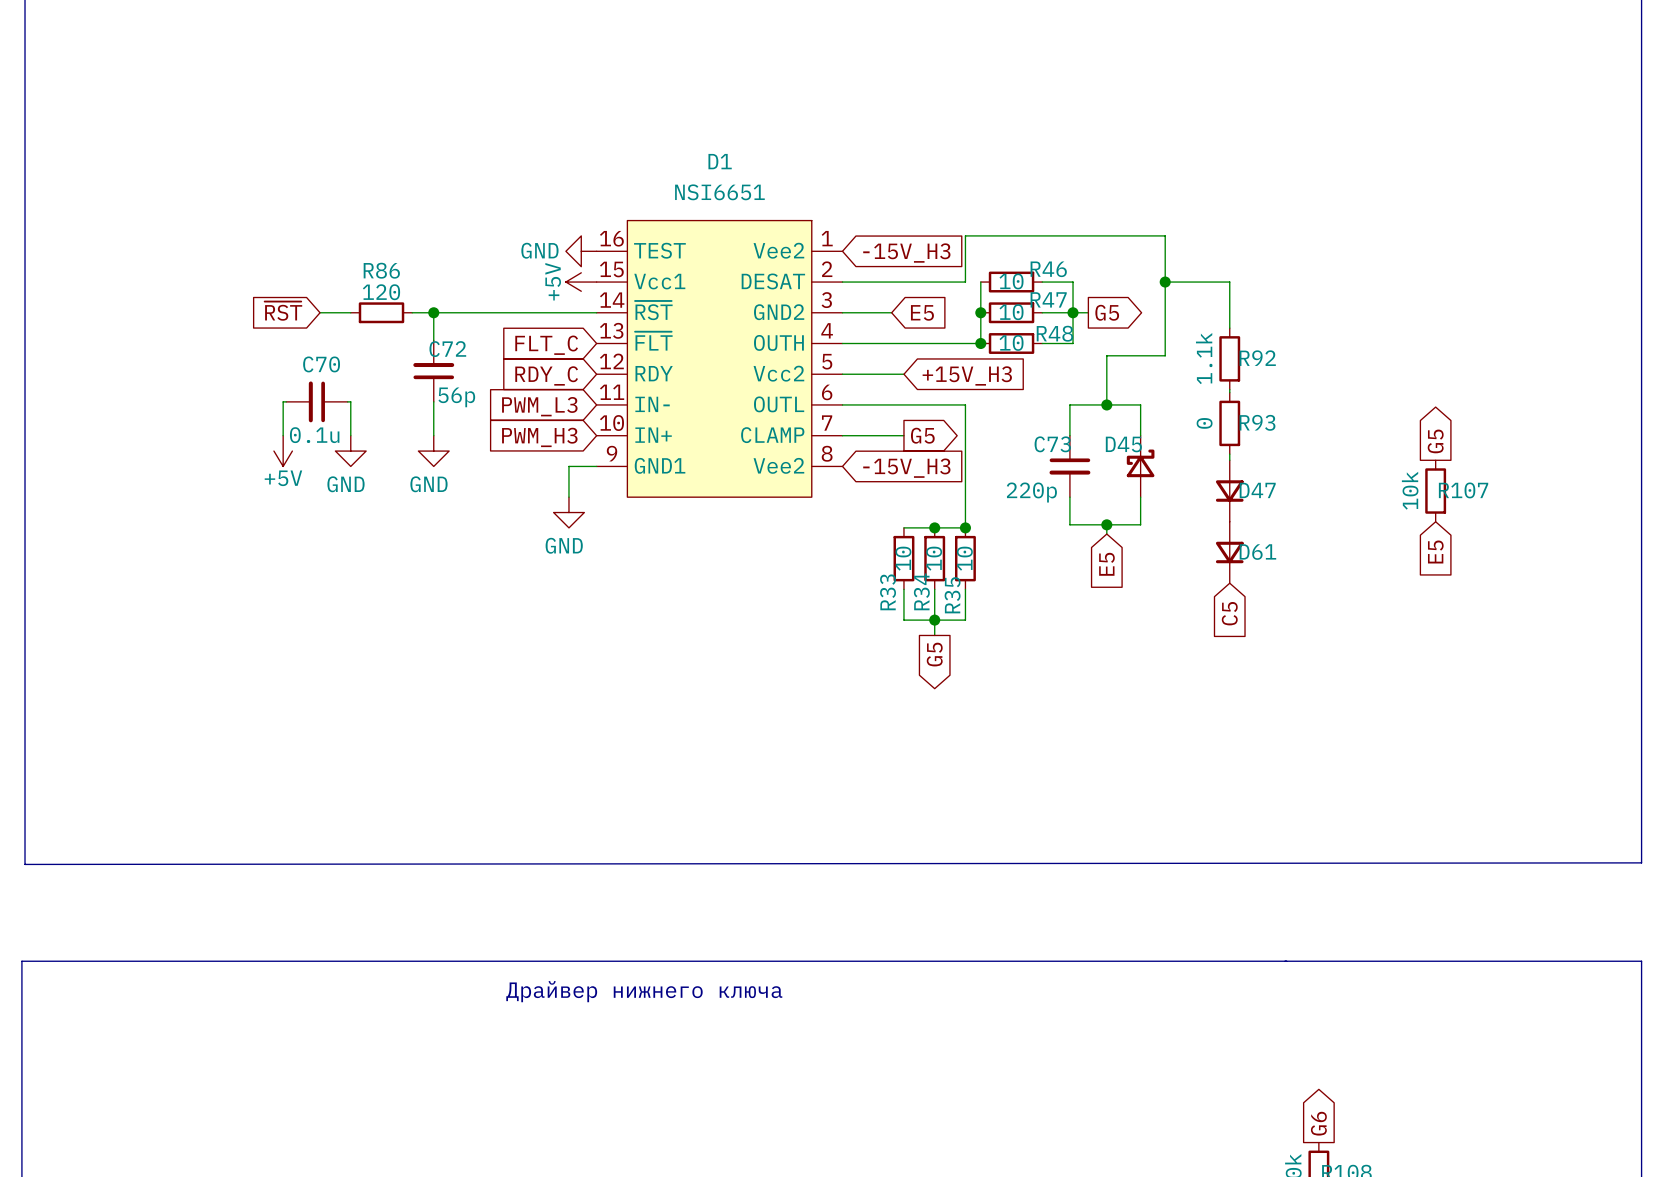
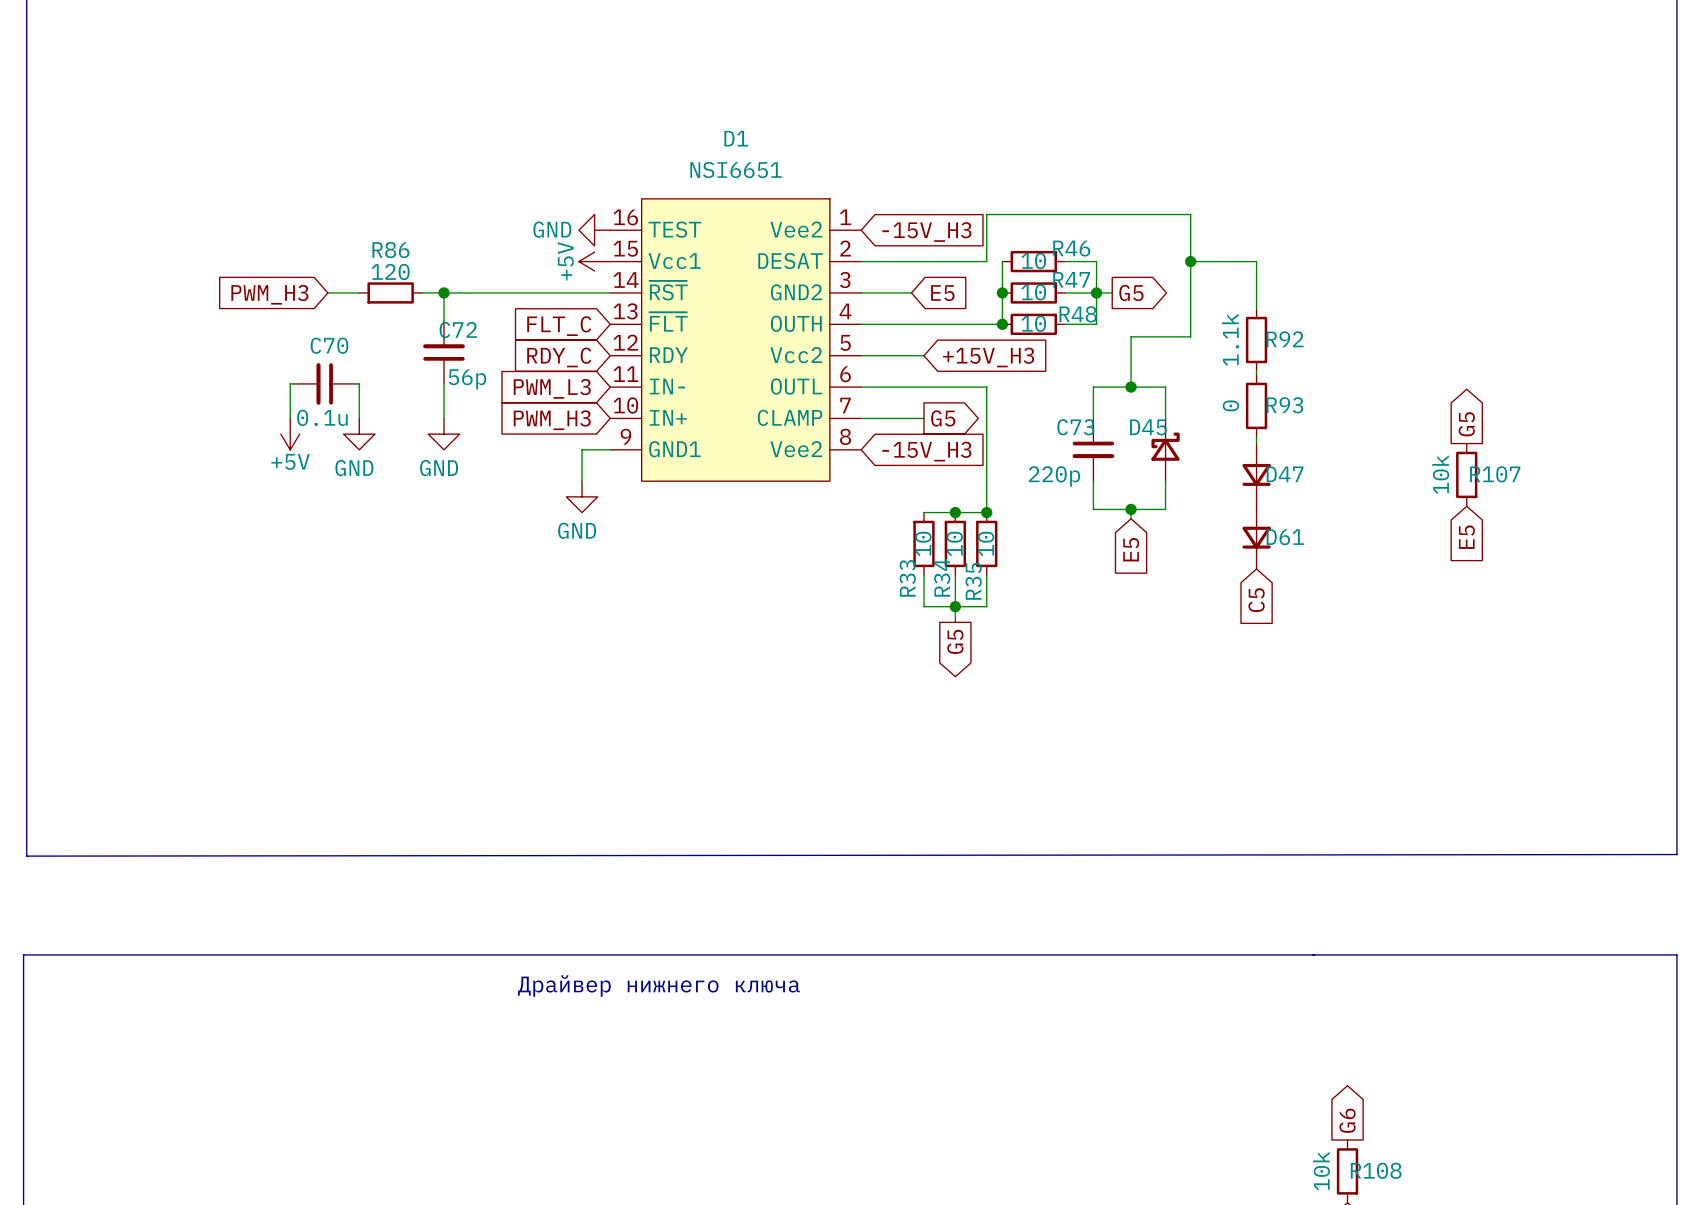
global label: ~{RST} (283, 311) -> PWM_H3 (269, 294)

